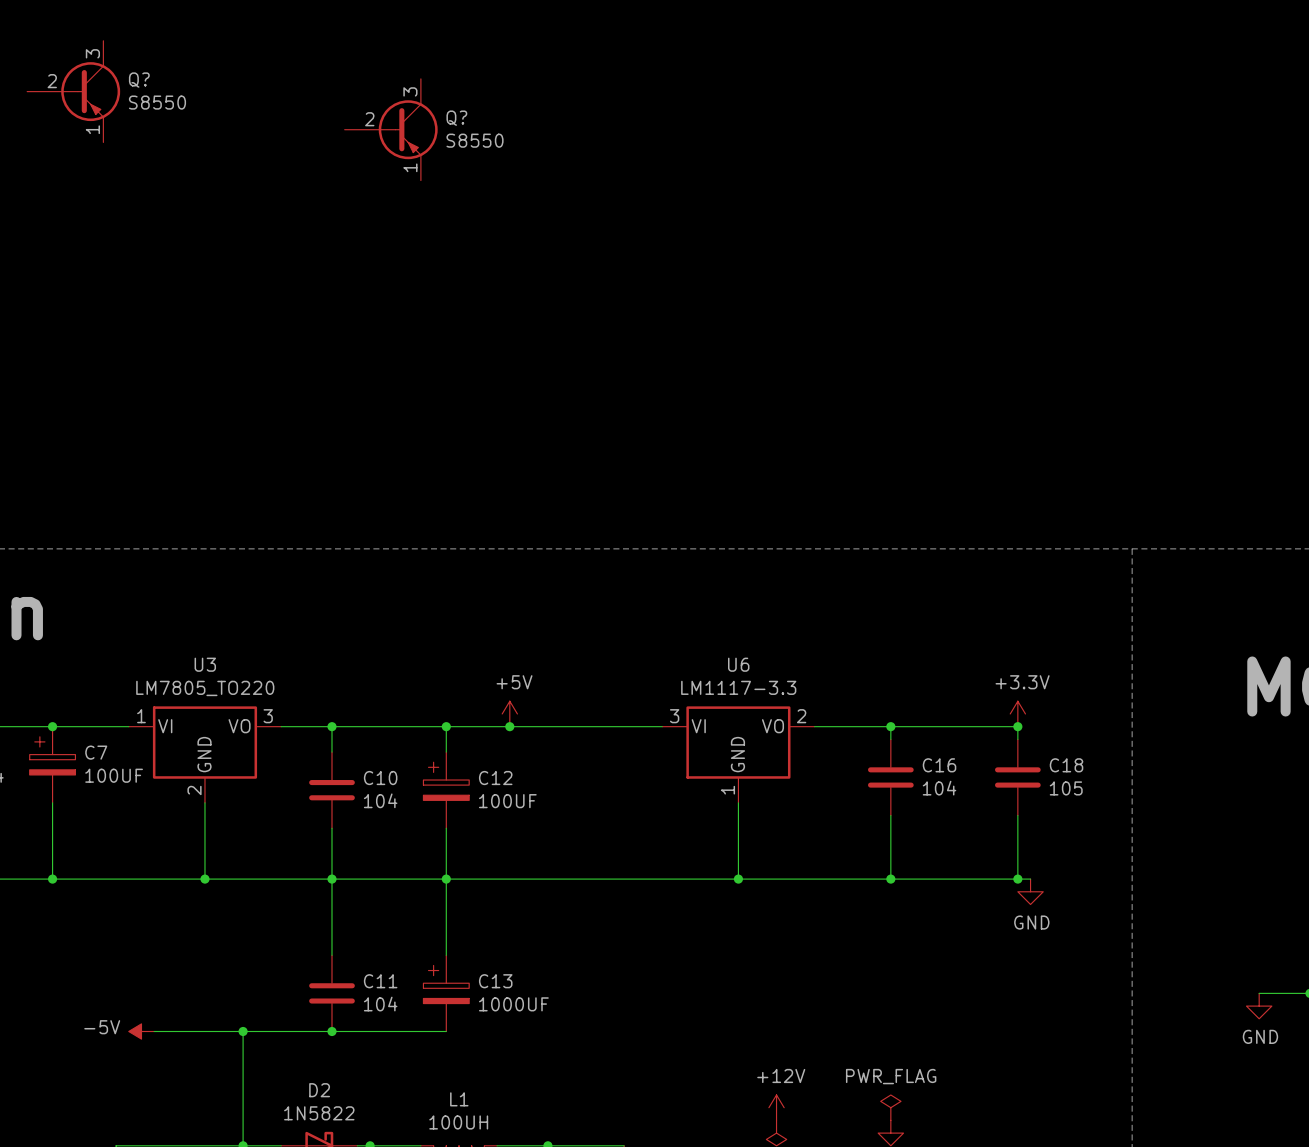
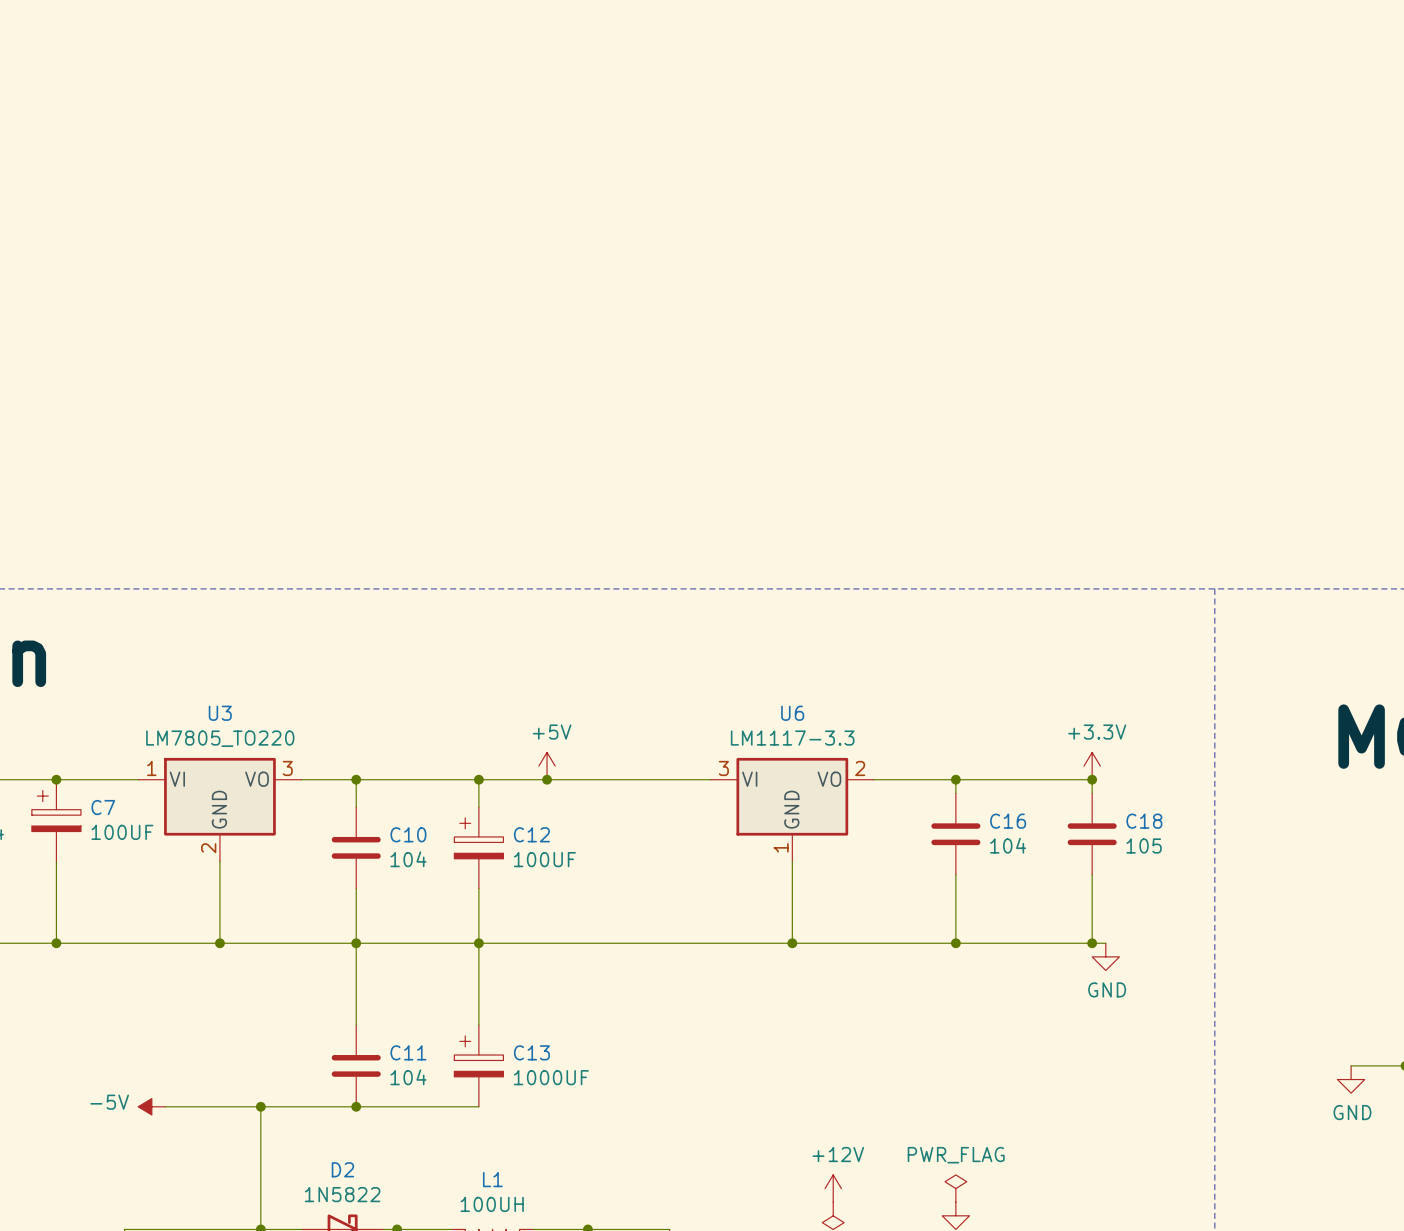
Q?: S8550 (73, 91) -> none
Q?: S8550 (391, 129) -> none

